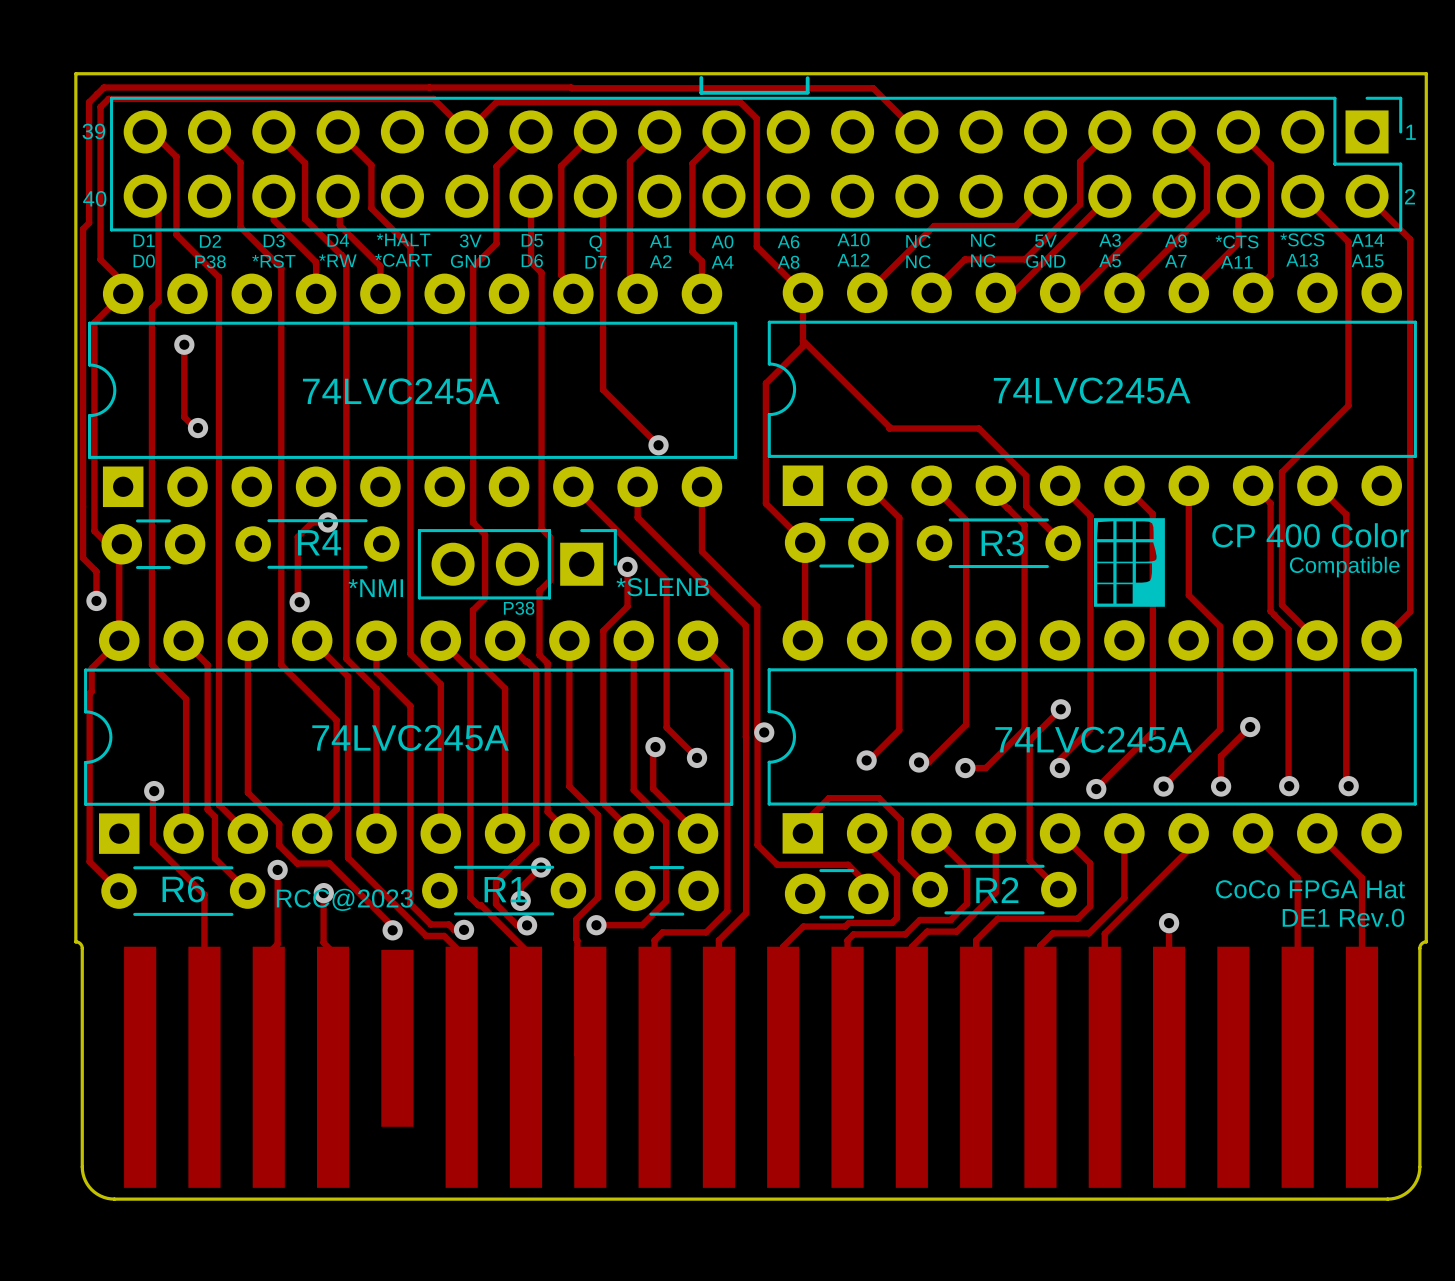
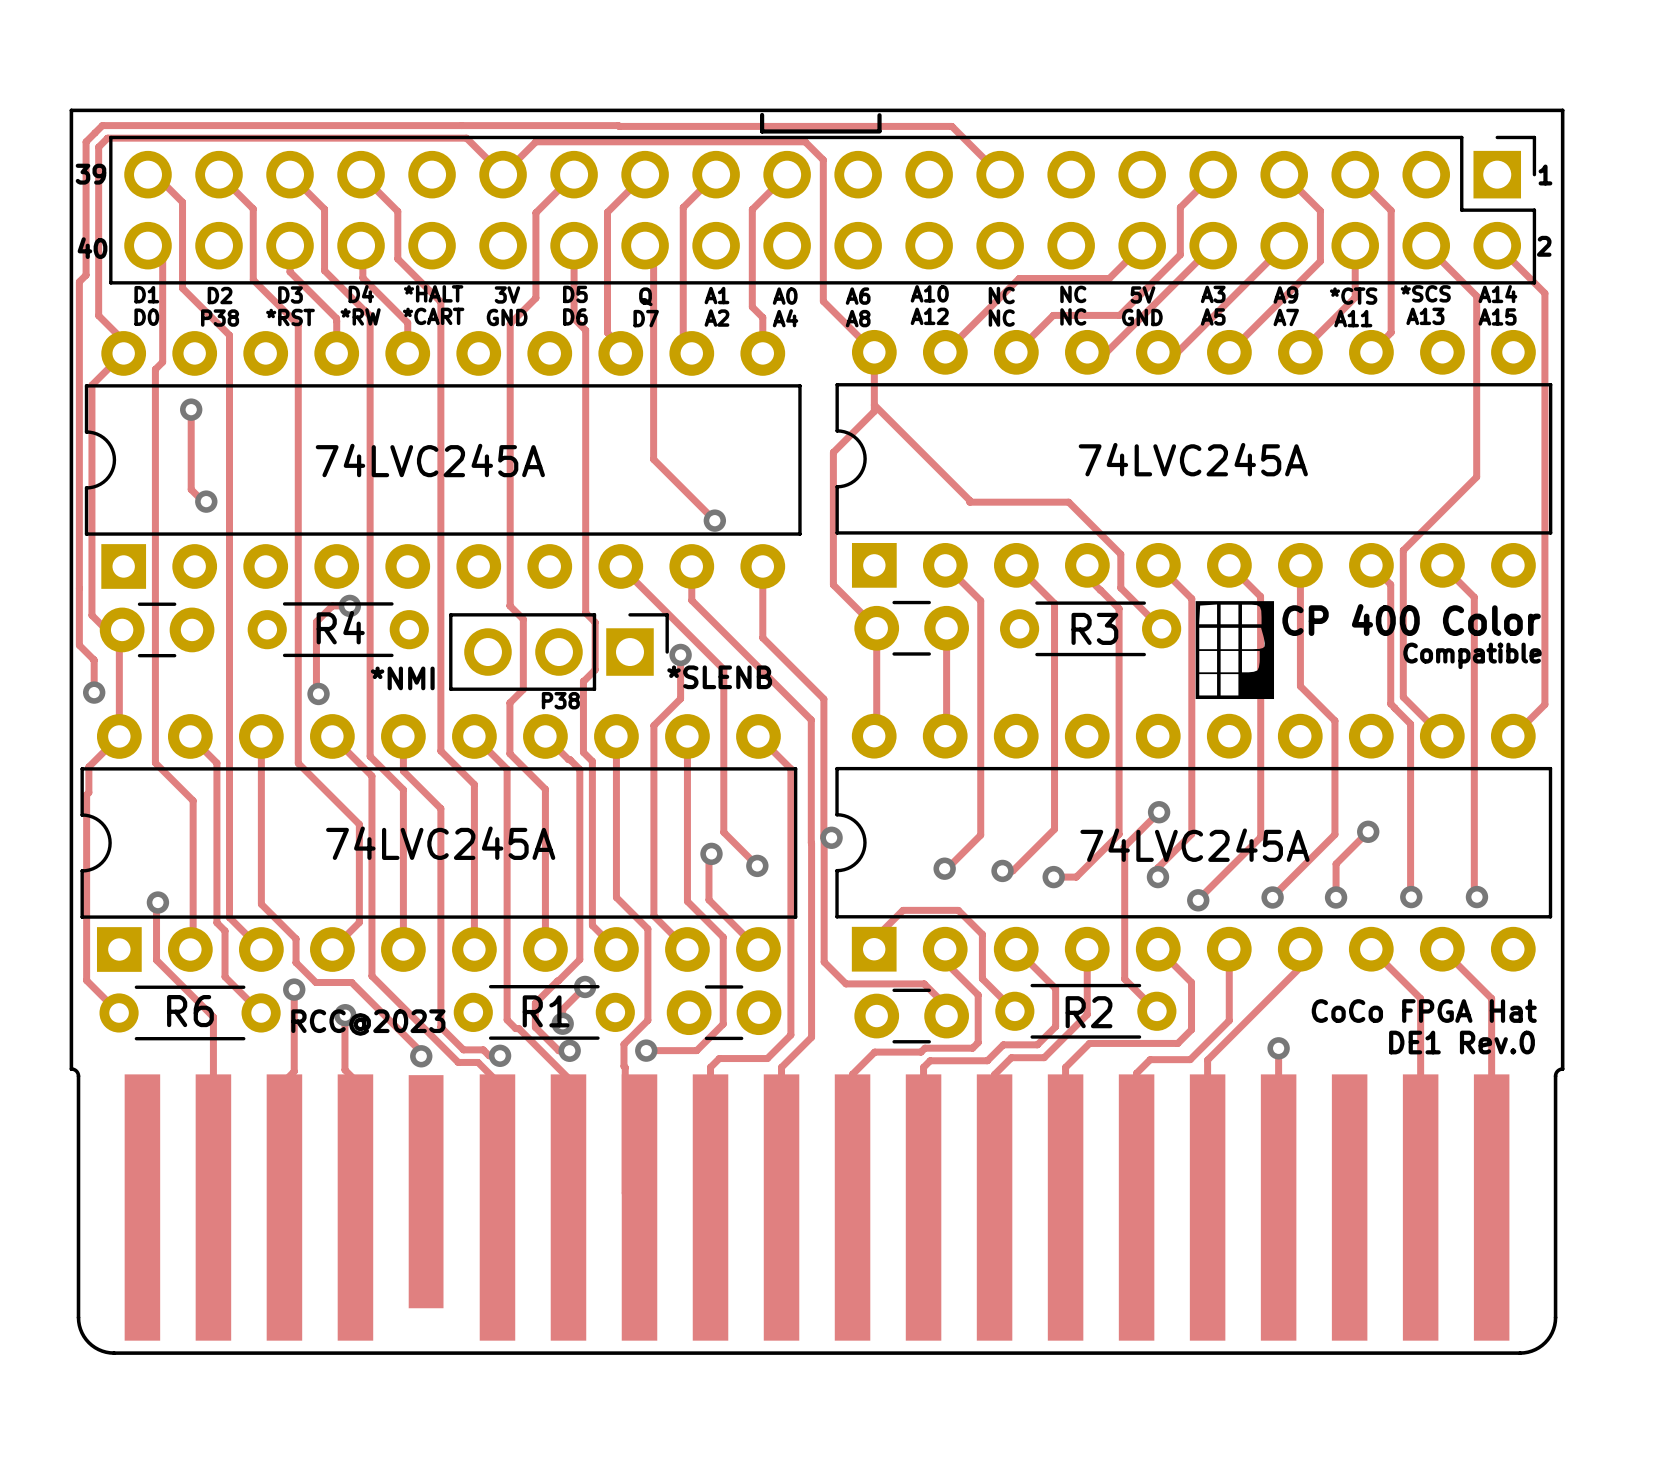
part footprint: [74, 72, 1428, 1201] -> [69, 108, 1565, 1355]

